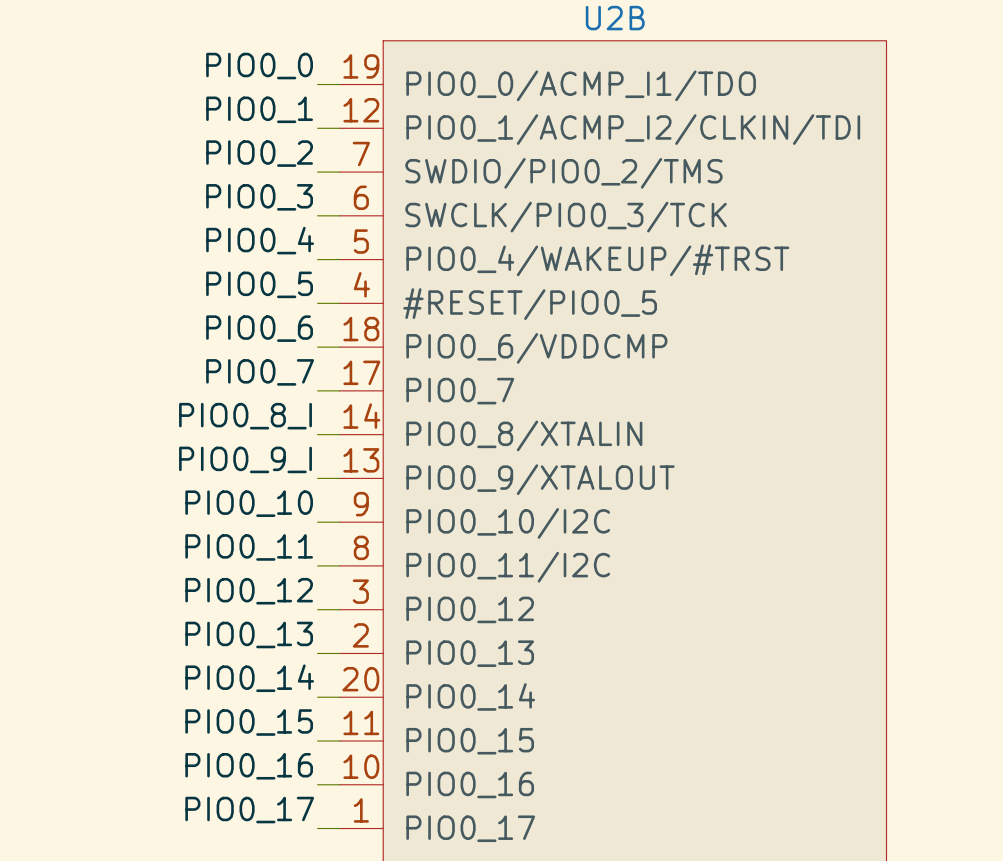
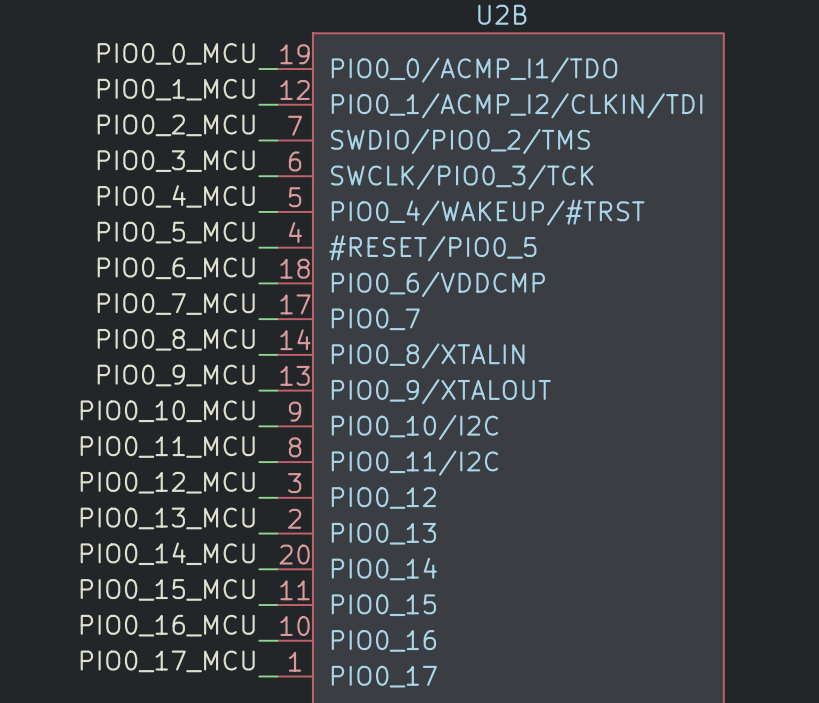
label: PIO0_0 (259, 66) -> PIO0_0_MCU (176, 53)
label: PIO0_1 (259, 109) -> PIO0_1_MCU (176, 89)
label: PIO0_2 (259, 153) -> PIO0_2_MCU (176, 125)
label: PIO0_3 (259, 197) -> PIO0_3_MCU (176, 161)
label: PIO0_4 (260, 240) -> PIO0_4_MCU (176, 196)
label: PIO0_5 (259, 284) -> PIO0_5_MCU (176, 232)
label: PIO0_6 (259, 328) -> PIO0_6_MCU (176, 268)
label: PIO0_7 (260, 372) -> PIO0_7_MCU (176, 304)
label: PIO0_8_I (245, 416) -> PIO0_8_MCU (176, 339)
label: PIO0_9_I (245, 459) -> PIO0_9_MCU (176, 375)
label: PIO0_10 (249, 503) -> PIO0_10_MCU (167, 411)
label: PIO0_11 (249, 547) -> PIO0_11_MCU (167, 446)
label: PIO0_12 (249, 591) -> PIO0_12_MCU (167, 482)
label: PIO0_13 (249, 634) -> PIO0_13_MCU (167, 518)
label: PIO0_14 (249, 678) -> PIO0_14_MCU (167, 553)
label: PIO0_15 (249, 722) -> PIO0_15_MCU (167, 589)
label: PIO0_16 (249, 766) -> PIO0_16_MCU (167, 625)
label: PIO0_17 (249, 810) -> PIO0_17_MCU (167, 661)

